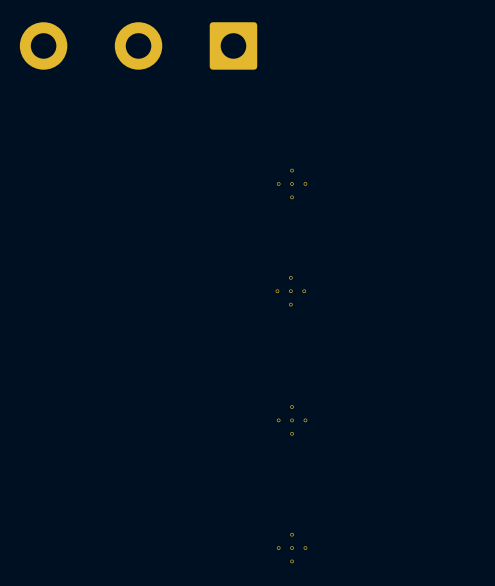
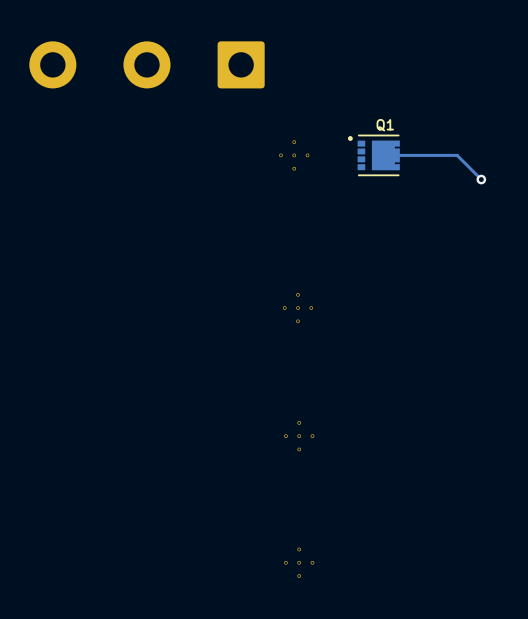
Q1: none -> (373, 155)
track: none -> (378, 155) (457, 155) (481, 179)
via: none -> (481, 179)
part position: (292, 183) -> (294, 155)

